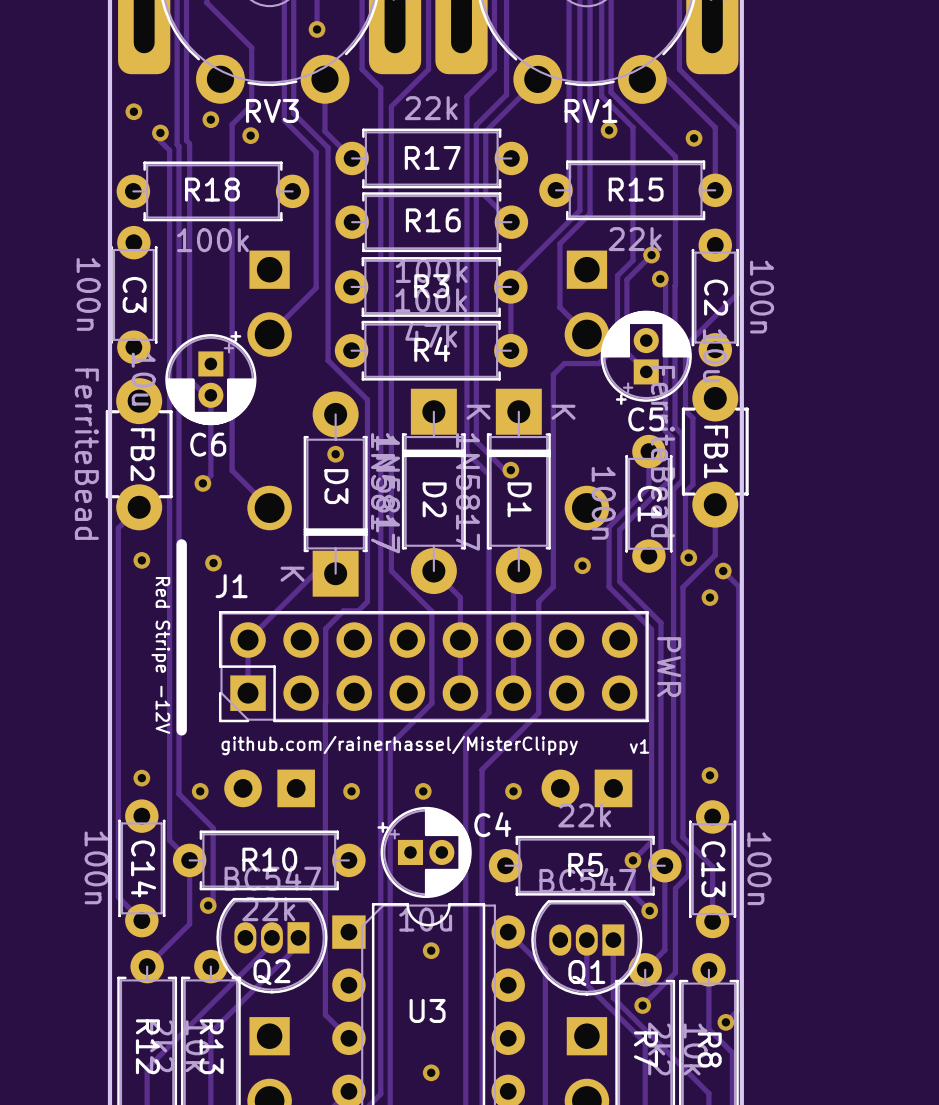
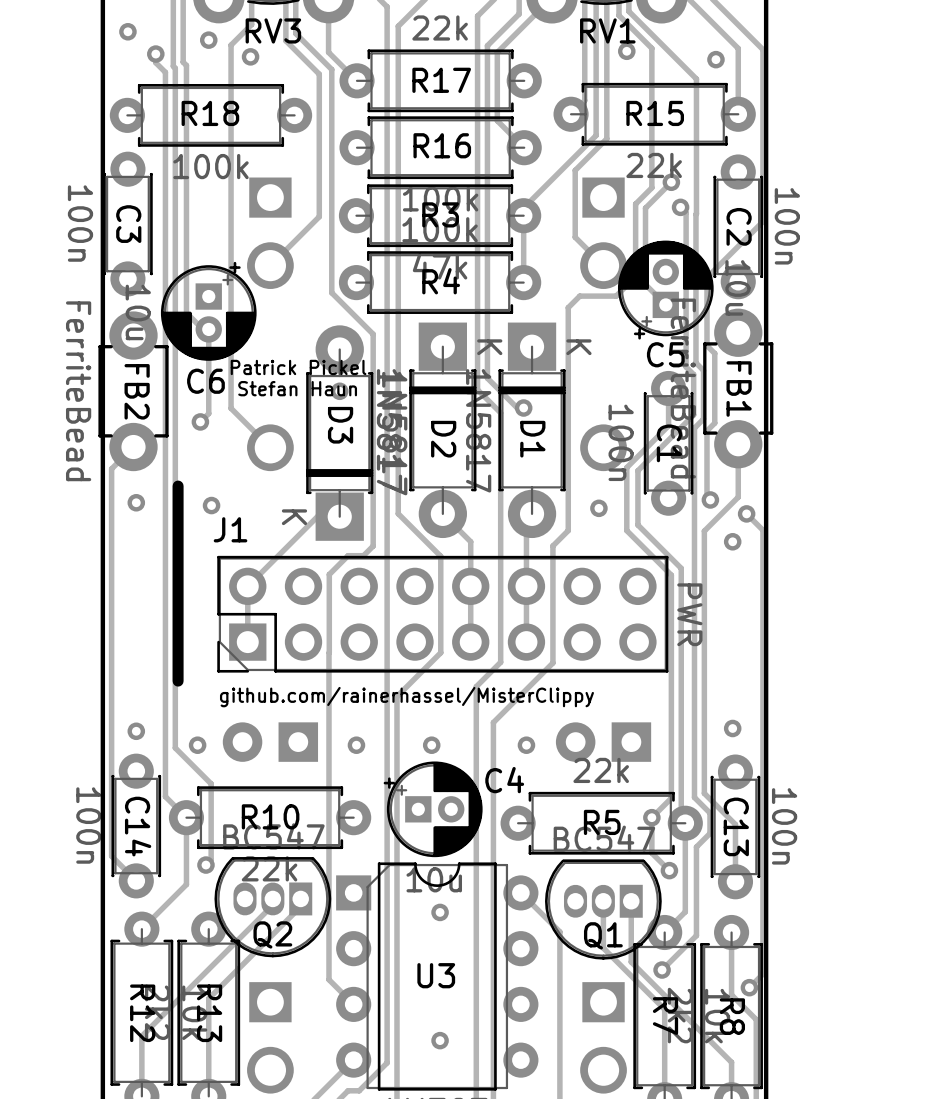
text: none -> Patrick Pickel (298, 367)
text: none -> Stefan Haun (297, 388)
text: Red Stripe -12V (160, 655) -> none
text: v1 (639, 746) -> none

